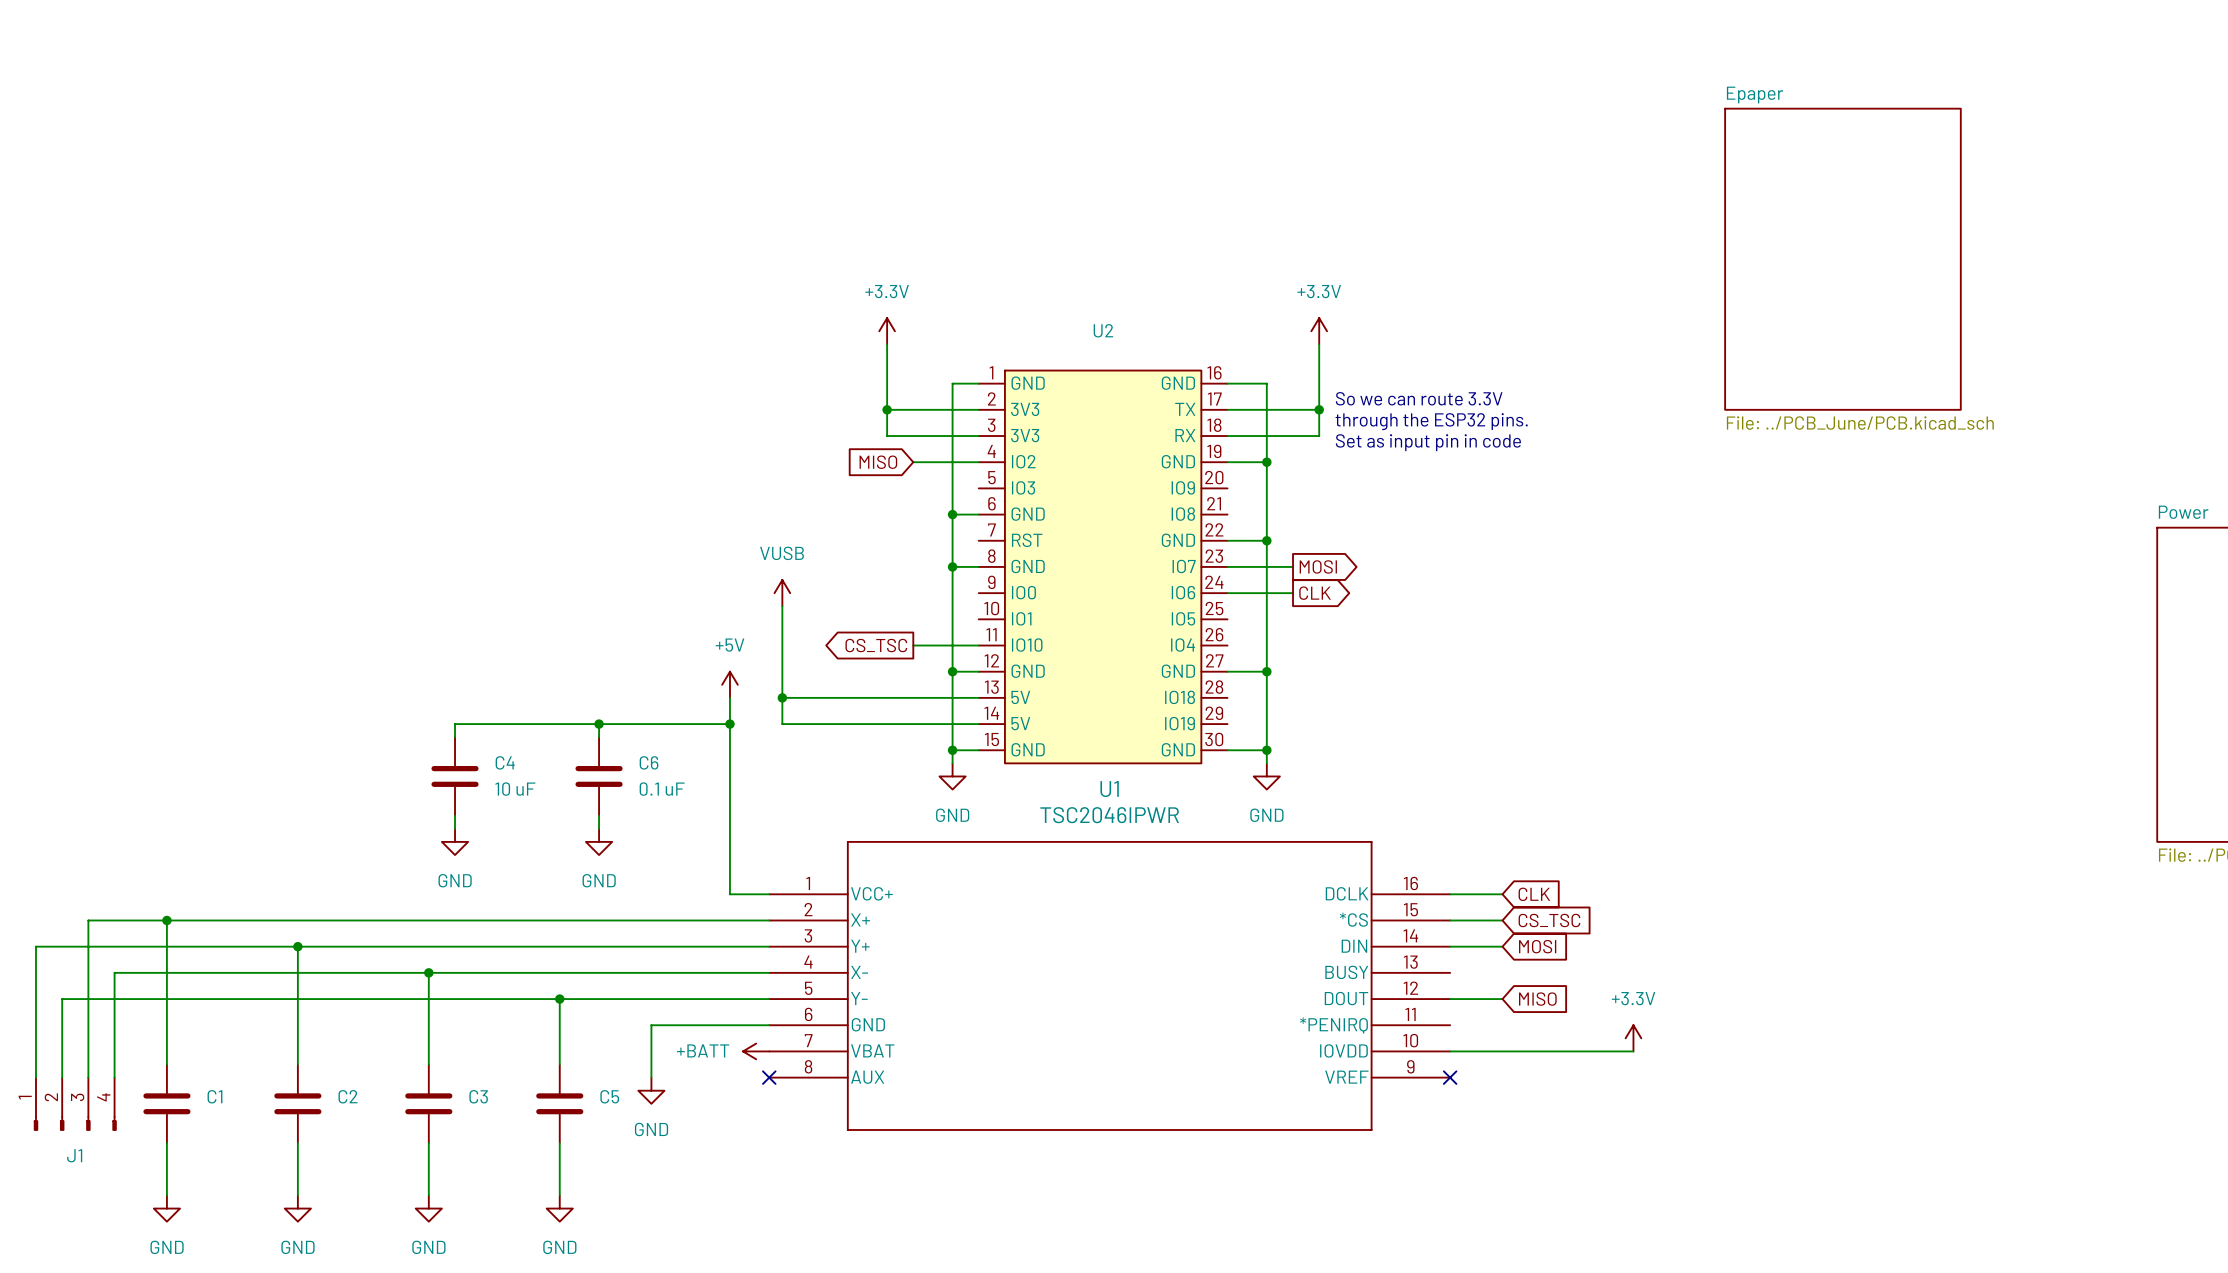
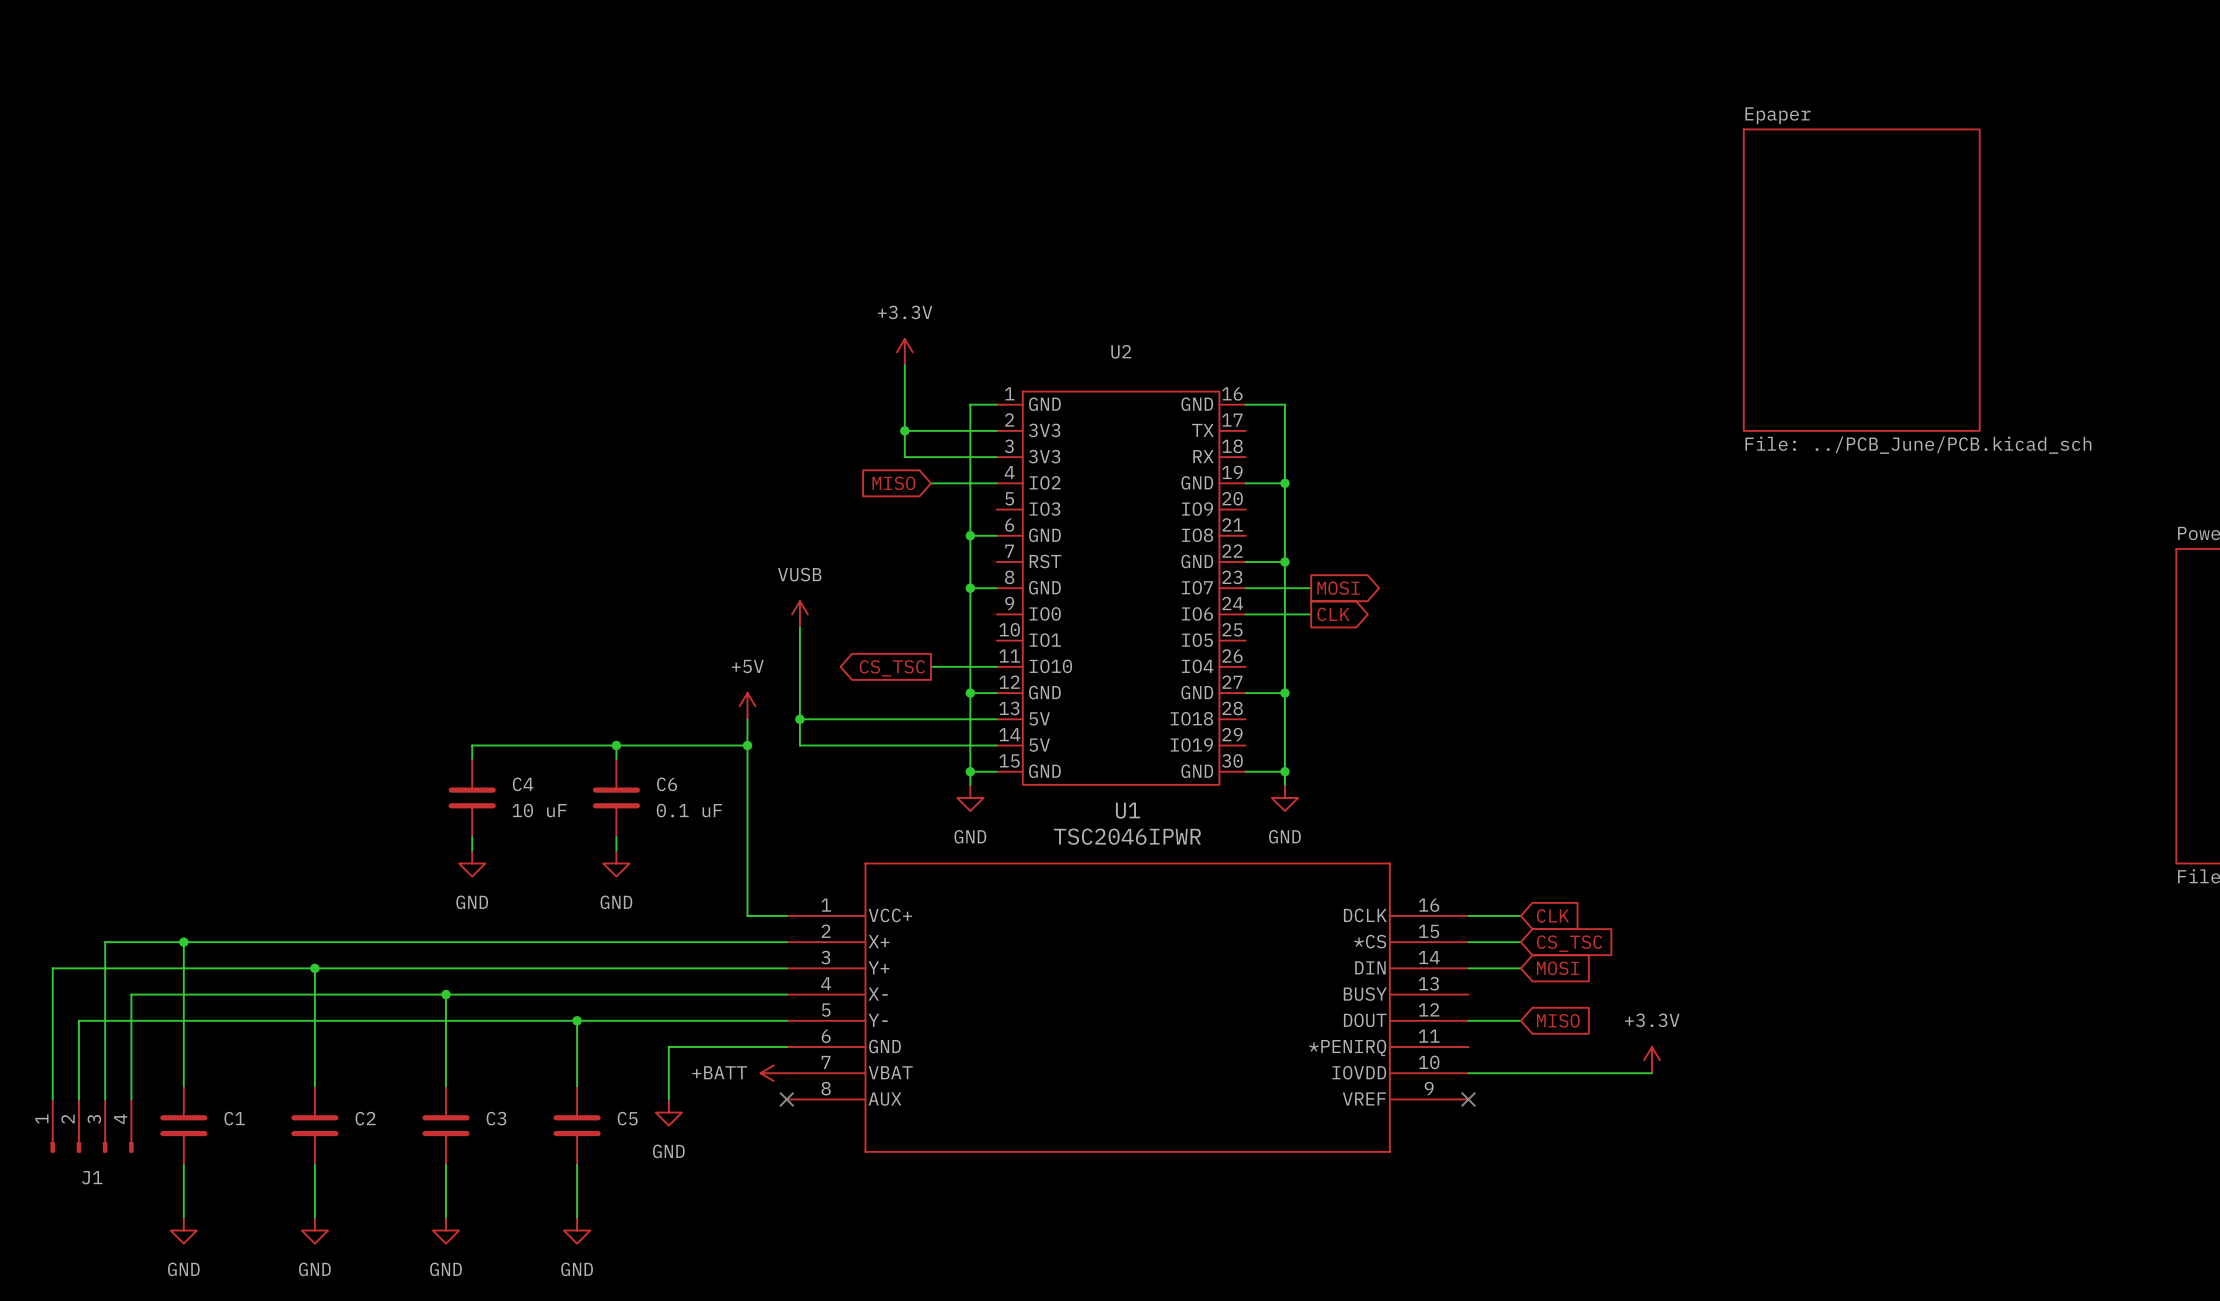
power symbol: +3.3V (1319, 331) -> none
wire: (1319, 344) (1319, 436) (1227, 436) -> none
text: So we can route 3.3V (1419, 398) -> none
wire: (1227, 409) (1319, 409) -> none
junction: (1319, 409) -> none
text: through the ESP32 pins. (1431, 421) -> none
text: Set as input pin in code (1428, 442) -> none

